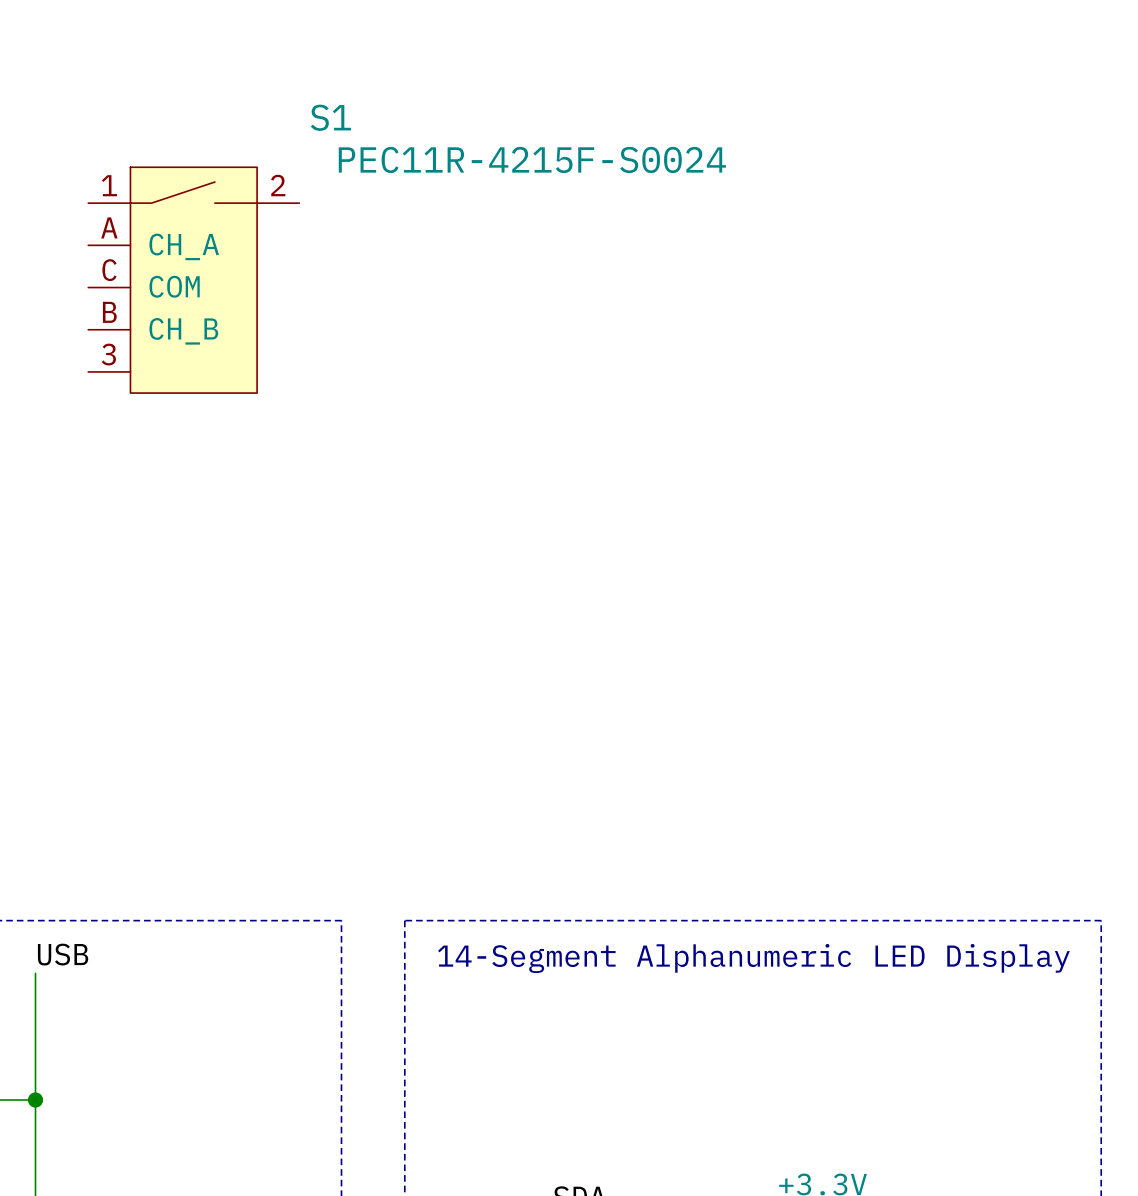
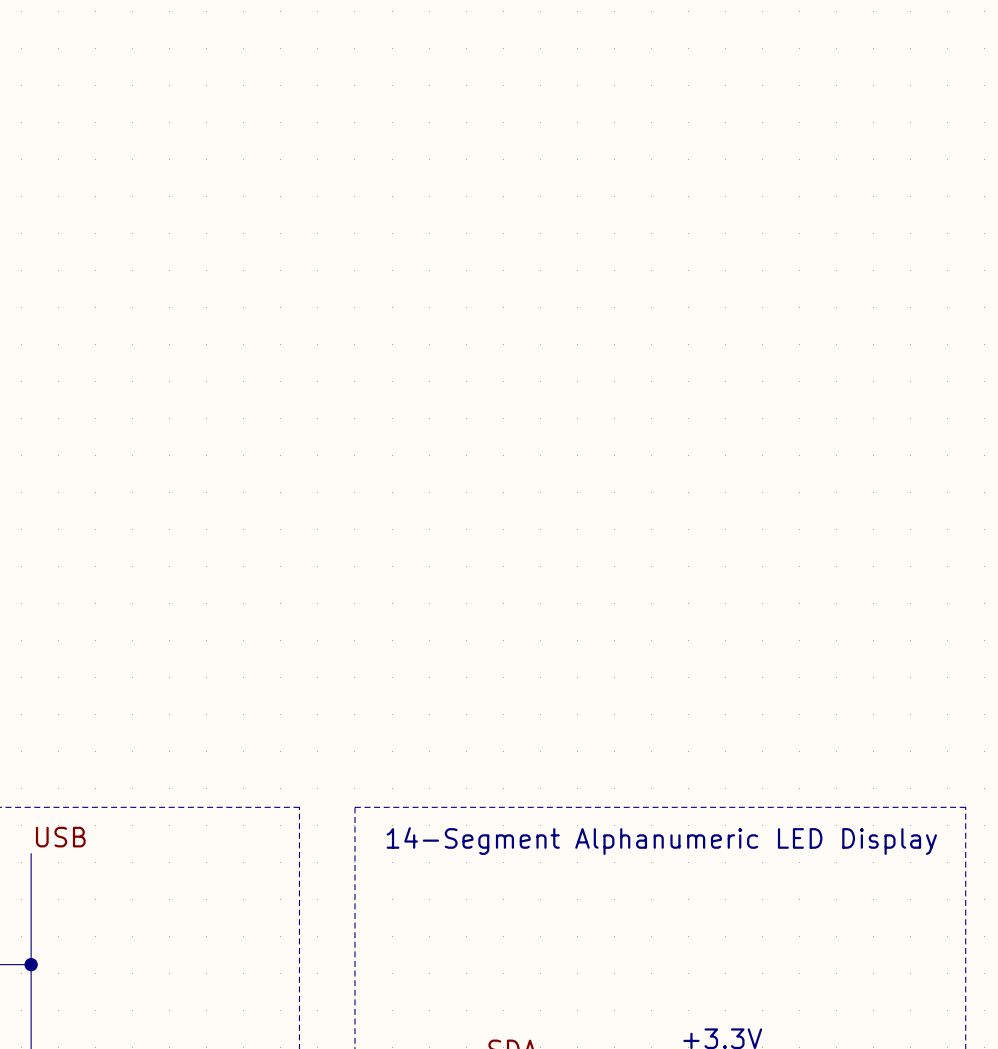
S1: PEC11R-4215F-S0024 (193, 280) -> none

